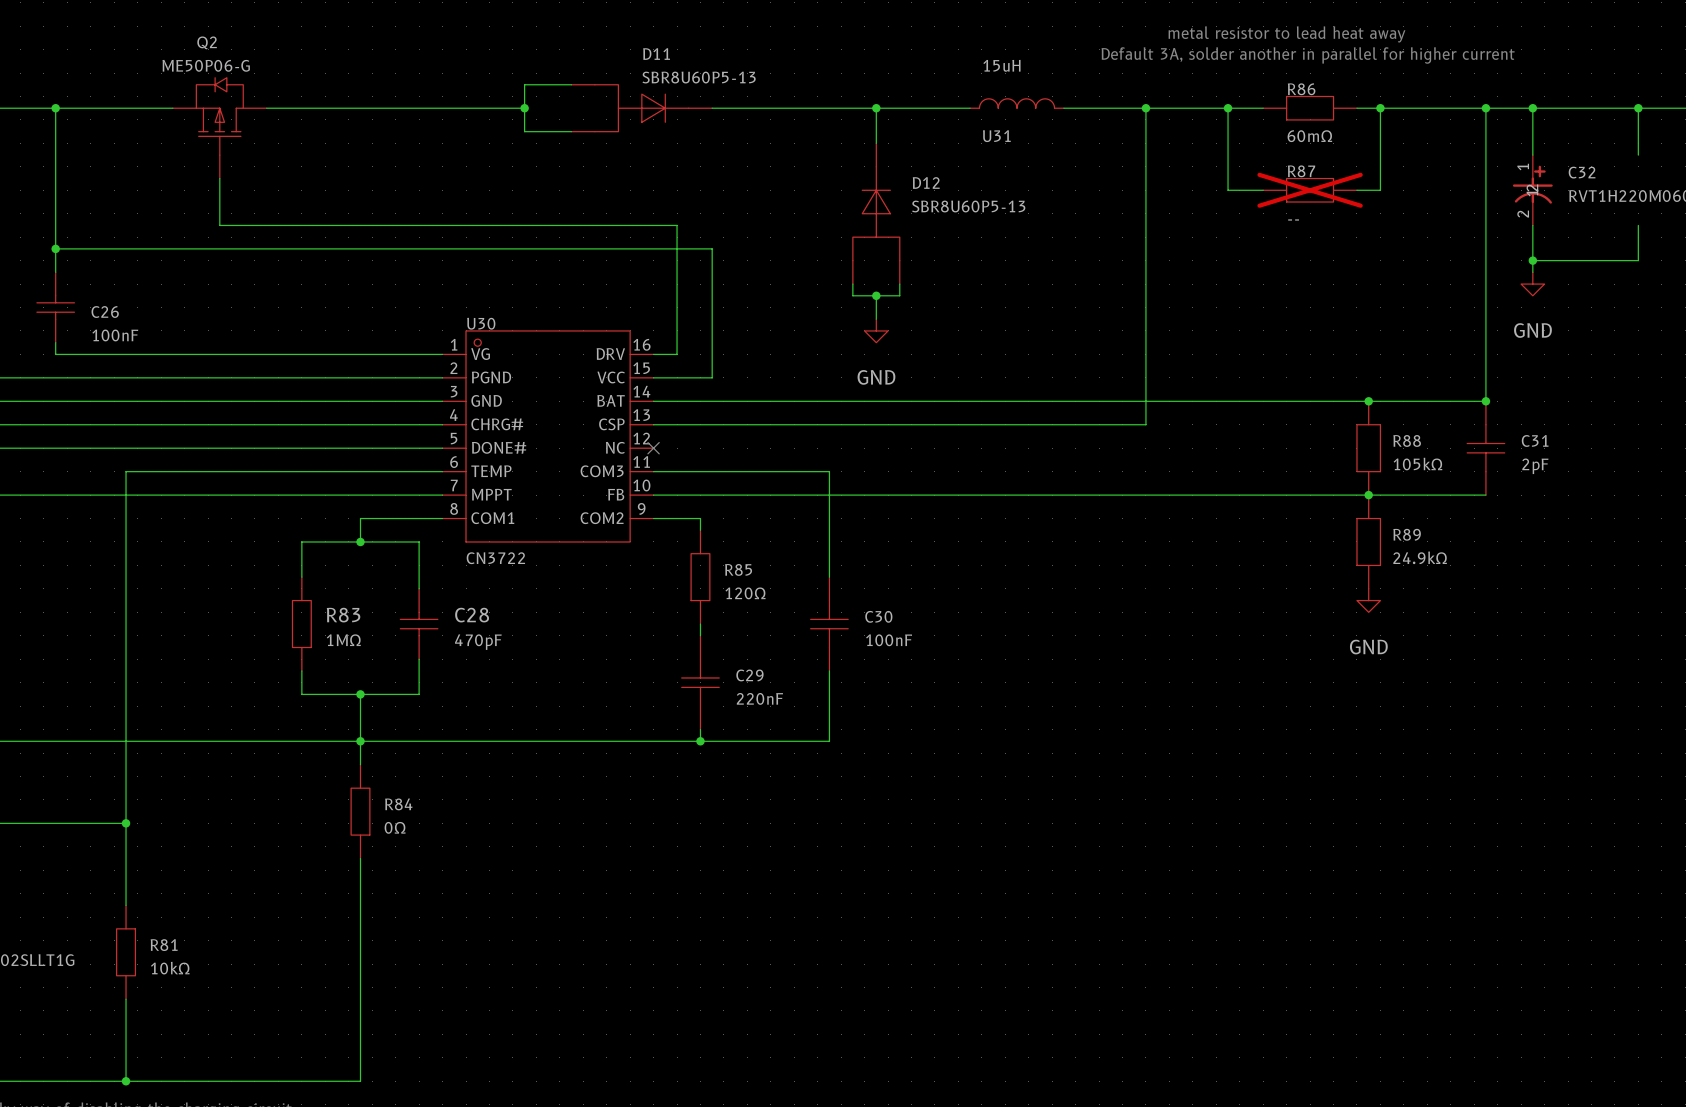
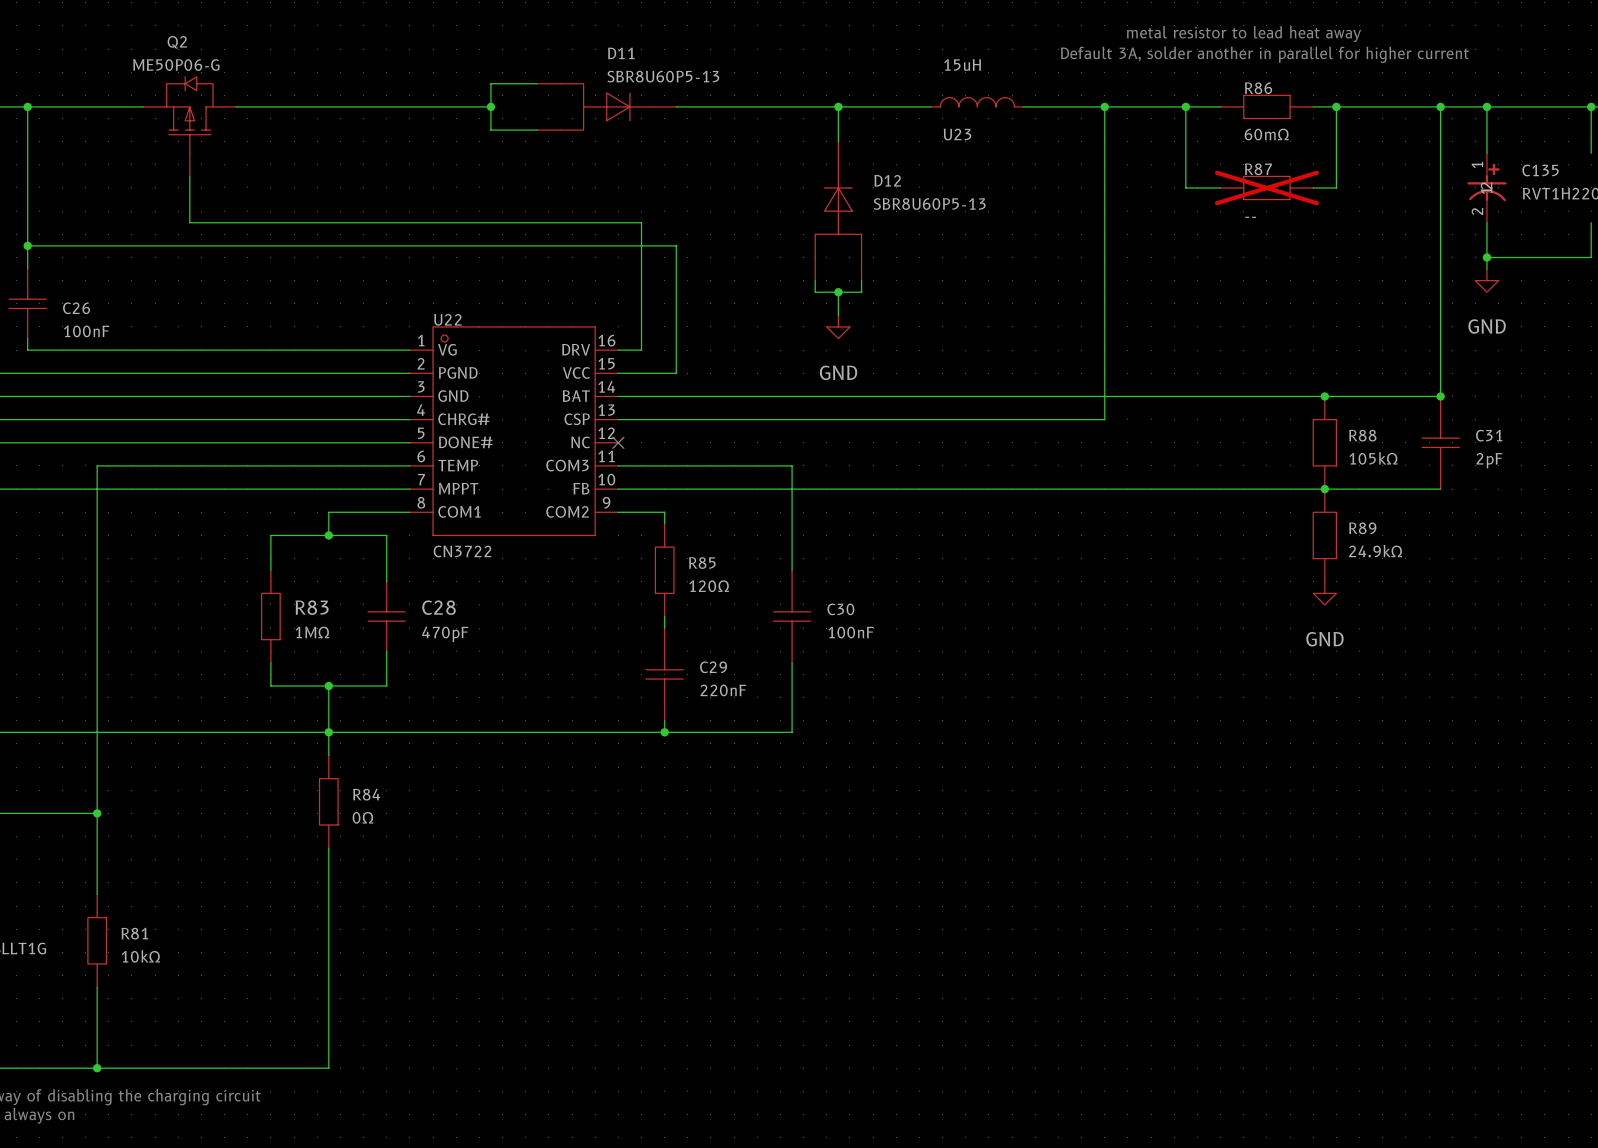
U31 name: U31 (996, 136) -> U23 (957, 134)
C32 name: C32 (1582, 172) -> C135 (1540, 170)
U30 name: U30 (481, 323) -> U22 (447, 319)

